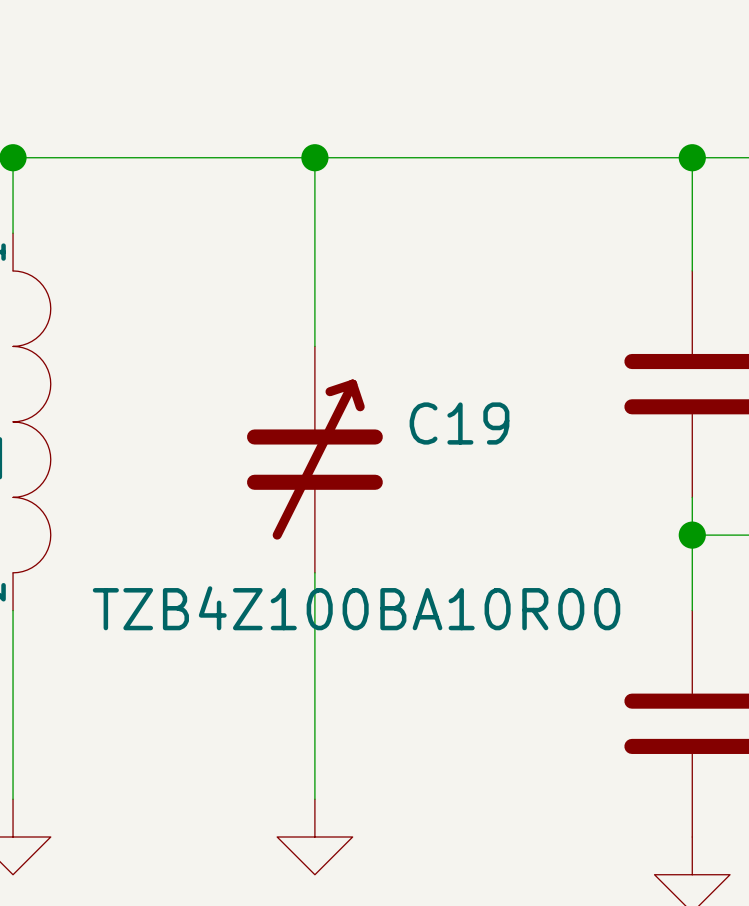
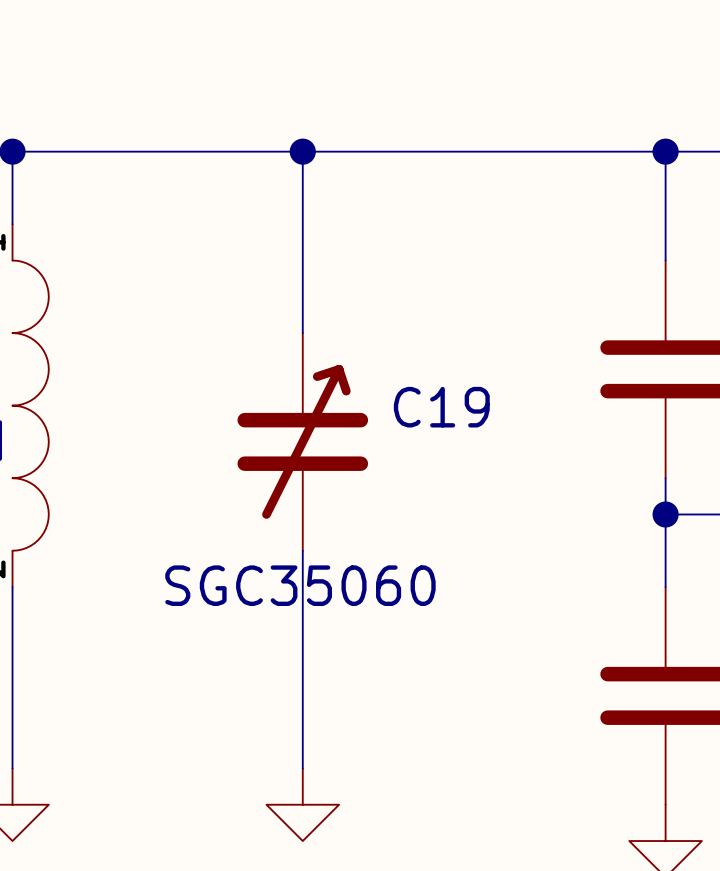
C19 value: TZB4Z100BA10R00 (356, 608) -> SGC35060 (300, 585)

